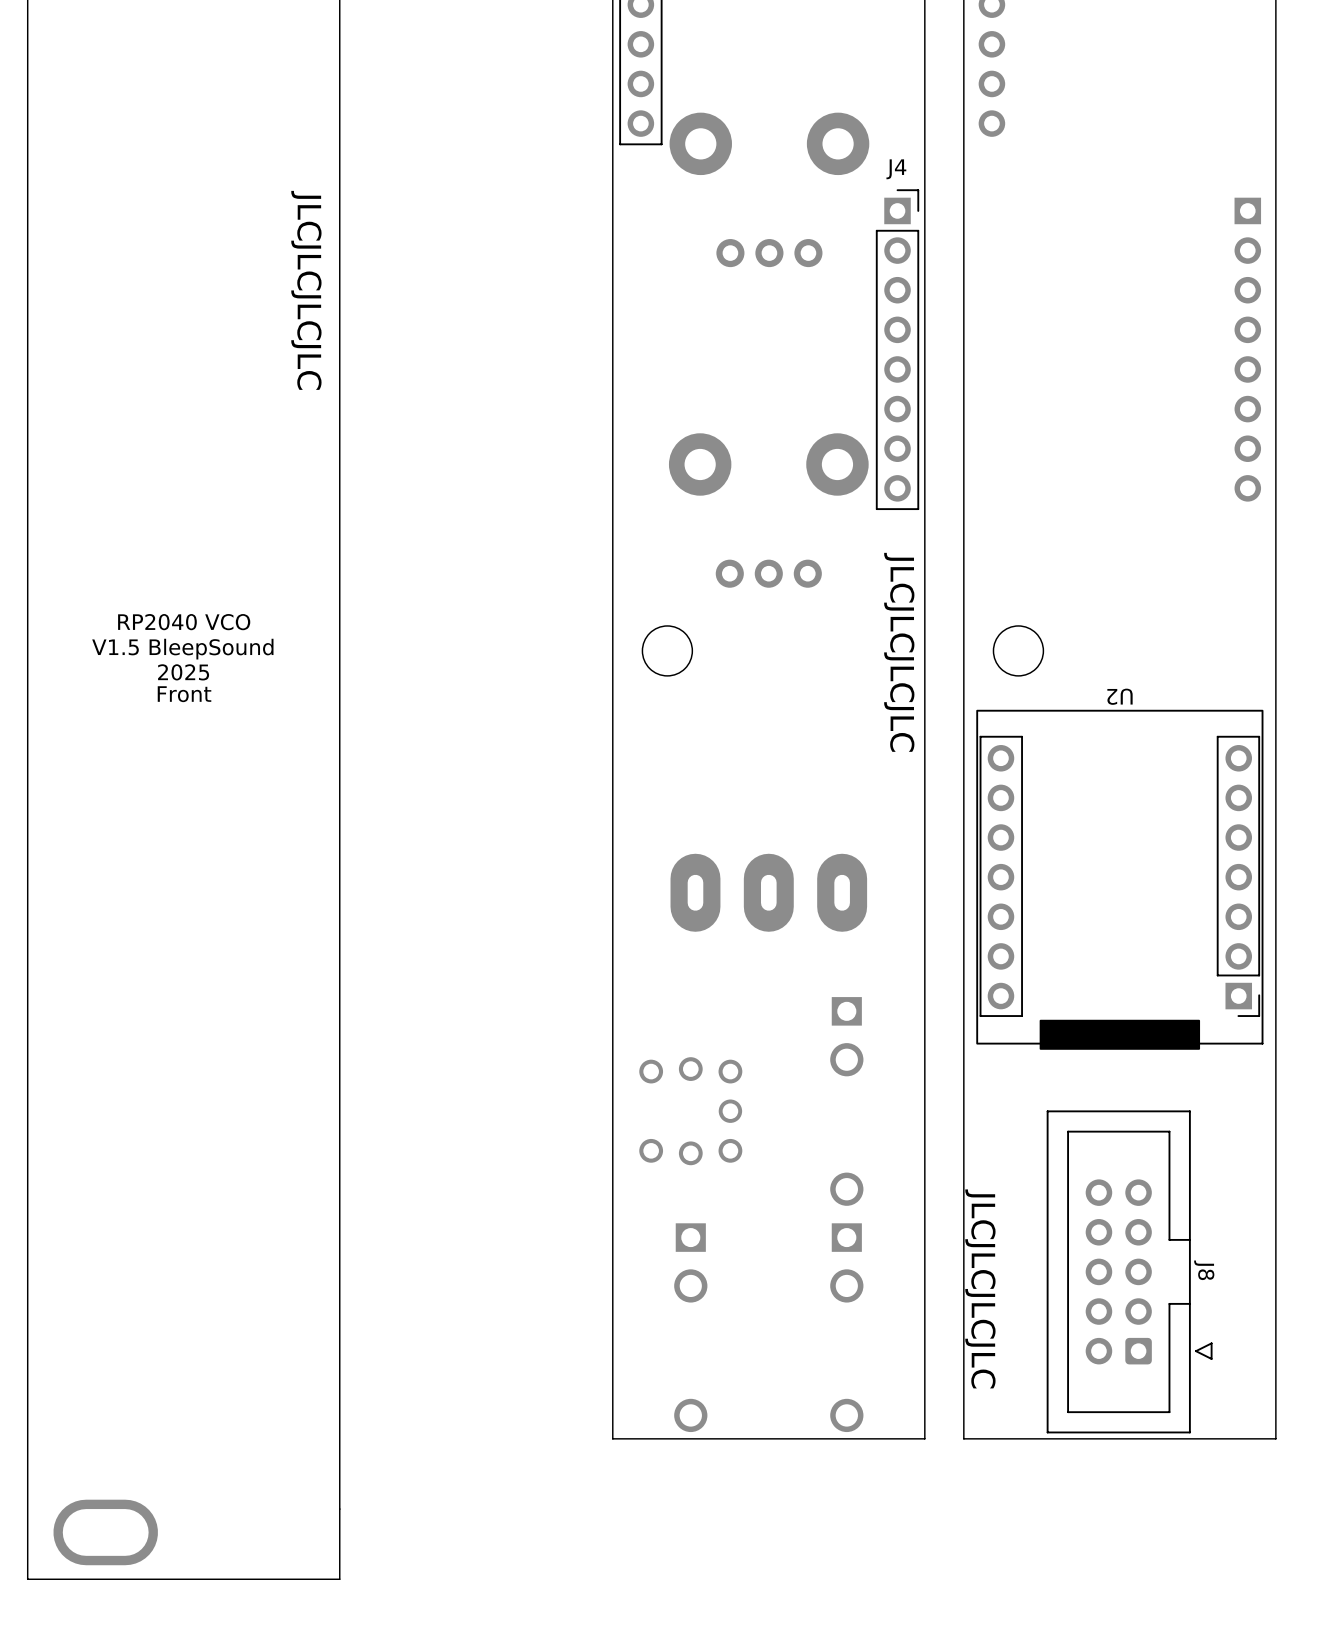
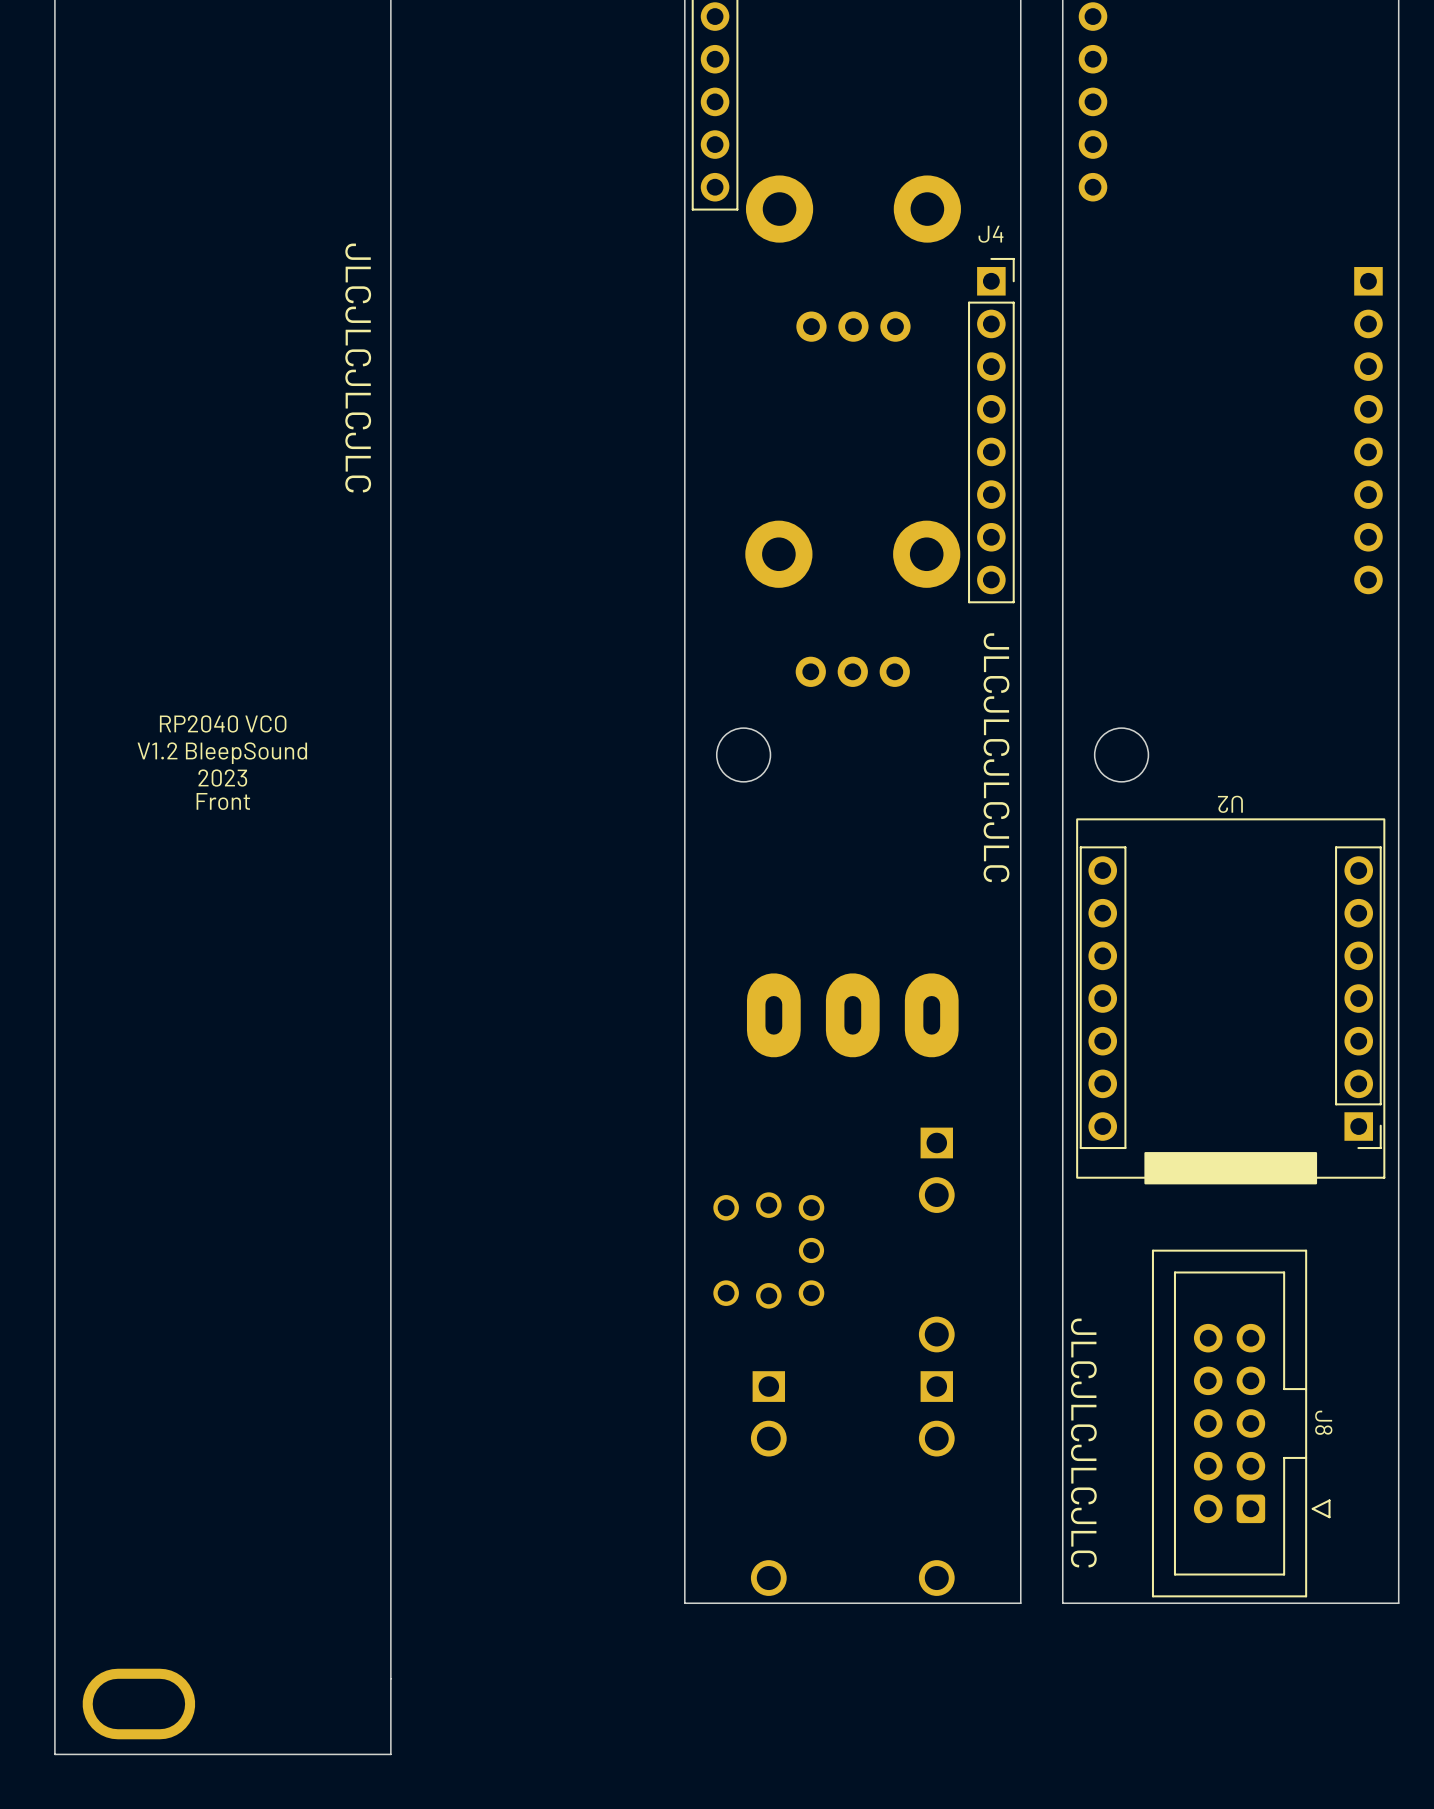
text: V1.5 BleepSound (182, 649) -> V1.2 BleepSound (222, 753)
text: 2025 (183, 672) -> 2023 (222, 778)

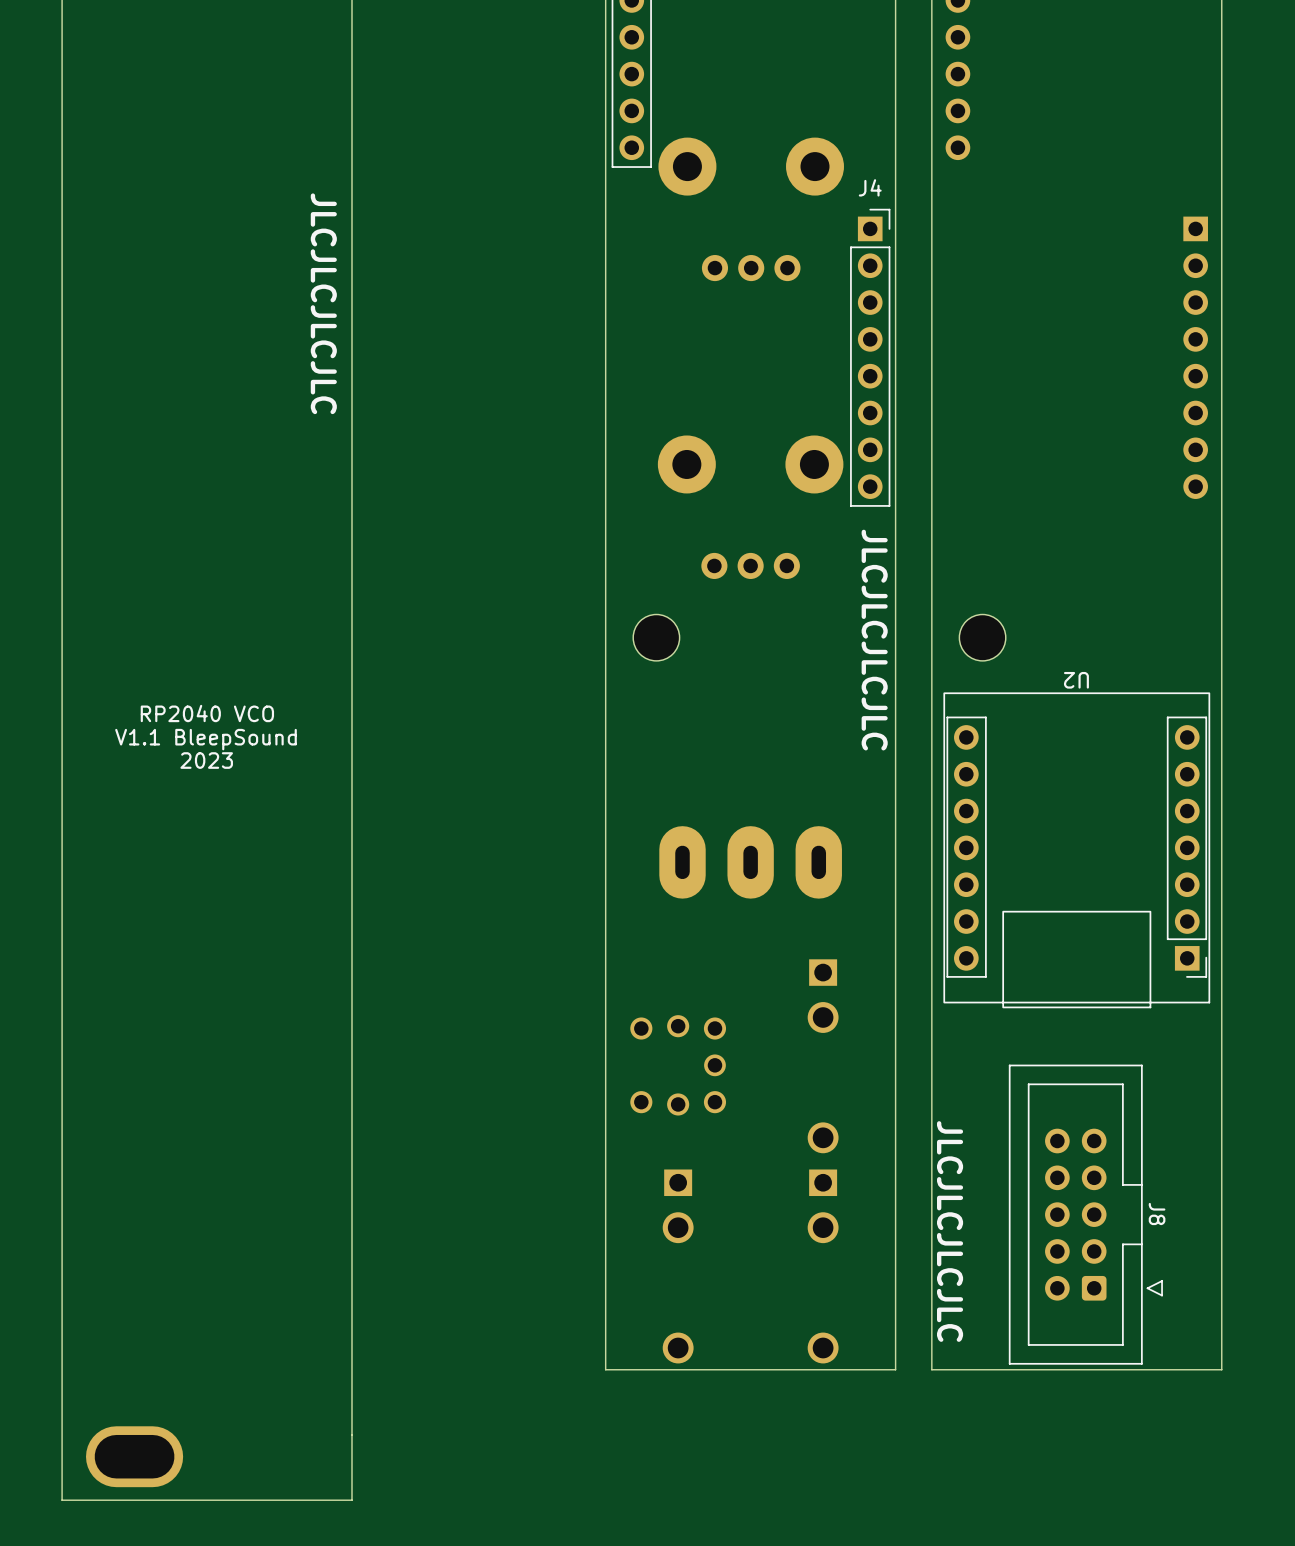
text position: RP2040 VCO (223, 723) -> RP2040 VCO (207, 713)
text: V1.2 BleepSound (222, 753) -> none
text position: 2023 (222, 778) -> 2023 (206, 760)
text: Front (223, 801) -> none
U2 footprint: [1076, 818, 1386, 1185] -> [943, 692, 1211, 1009]
text: none -> V1.1 BleepSound (206, 739)

